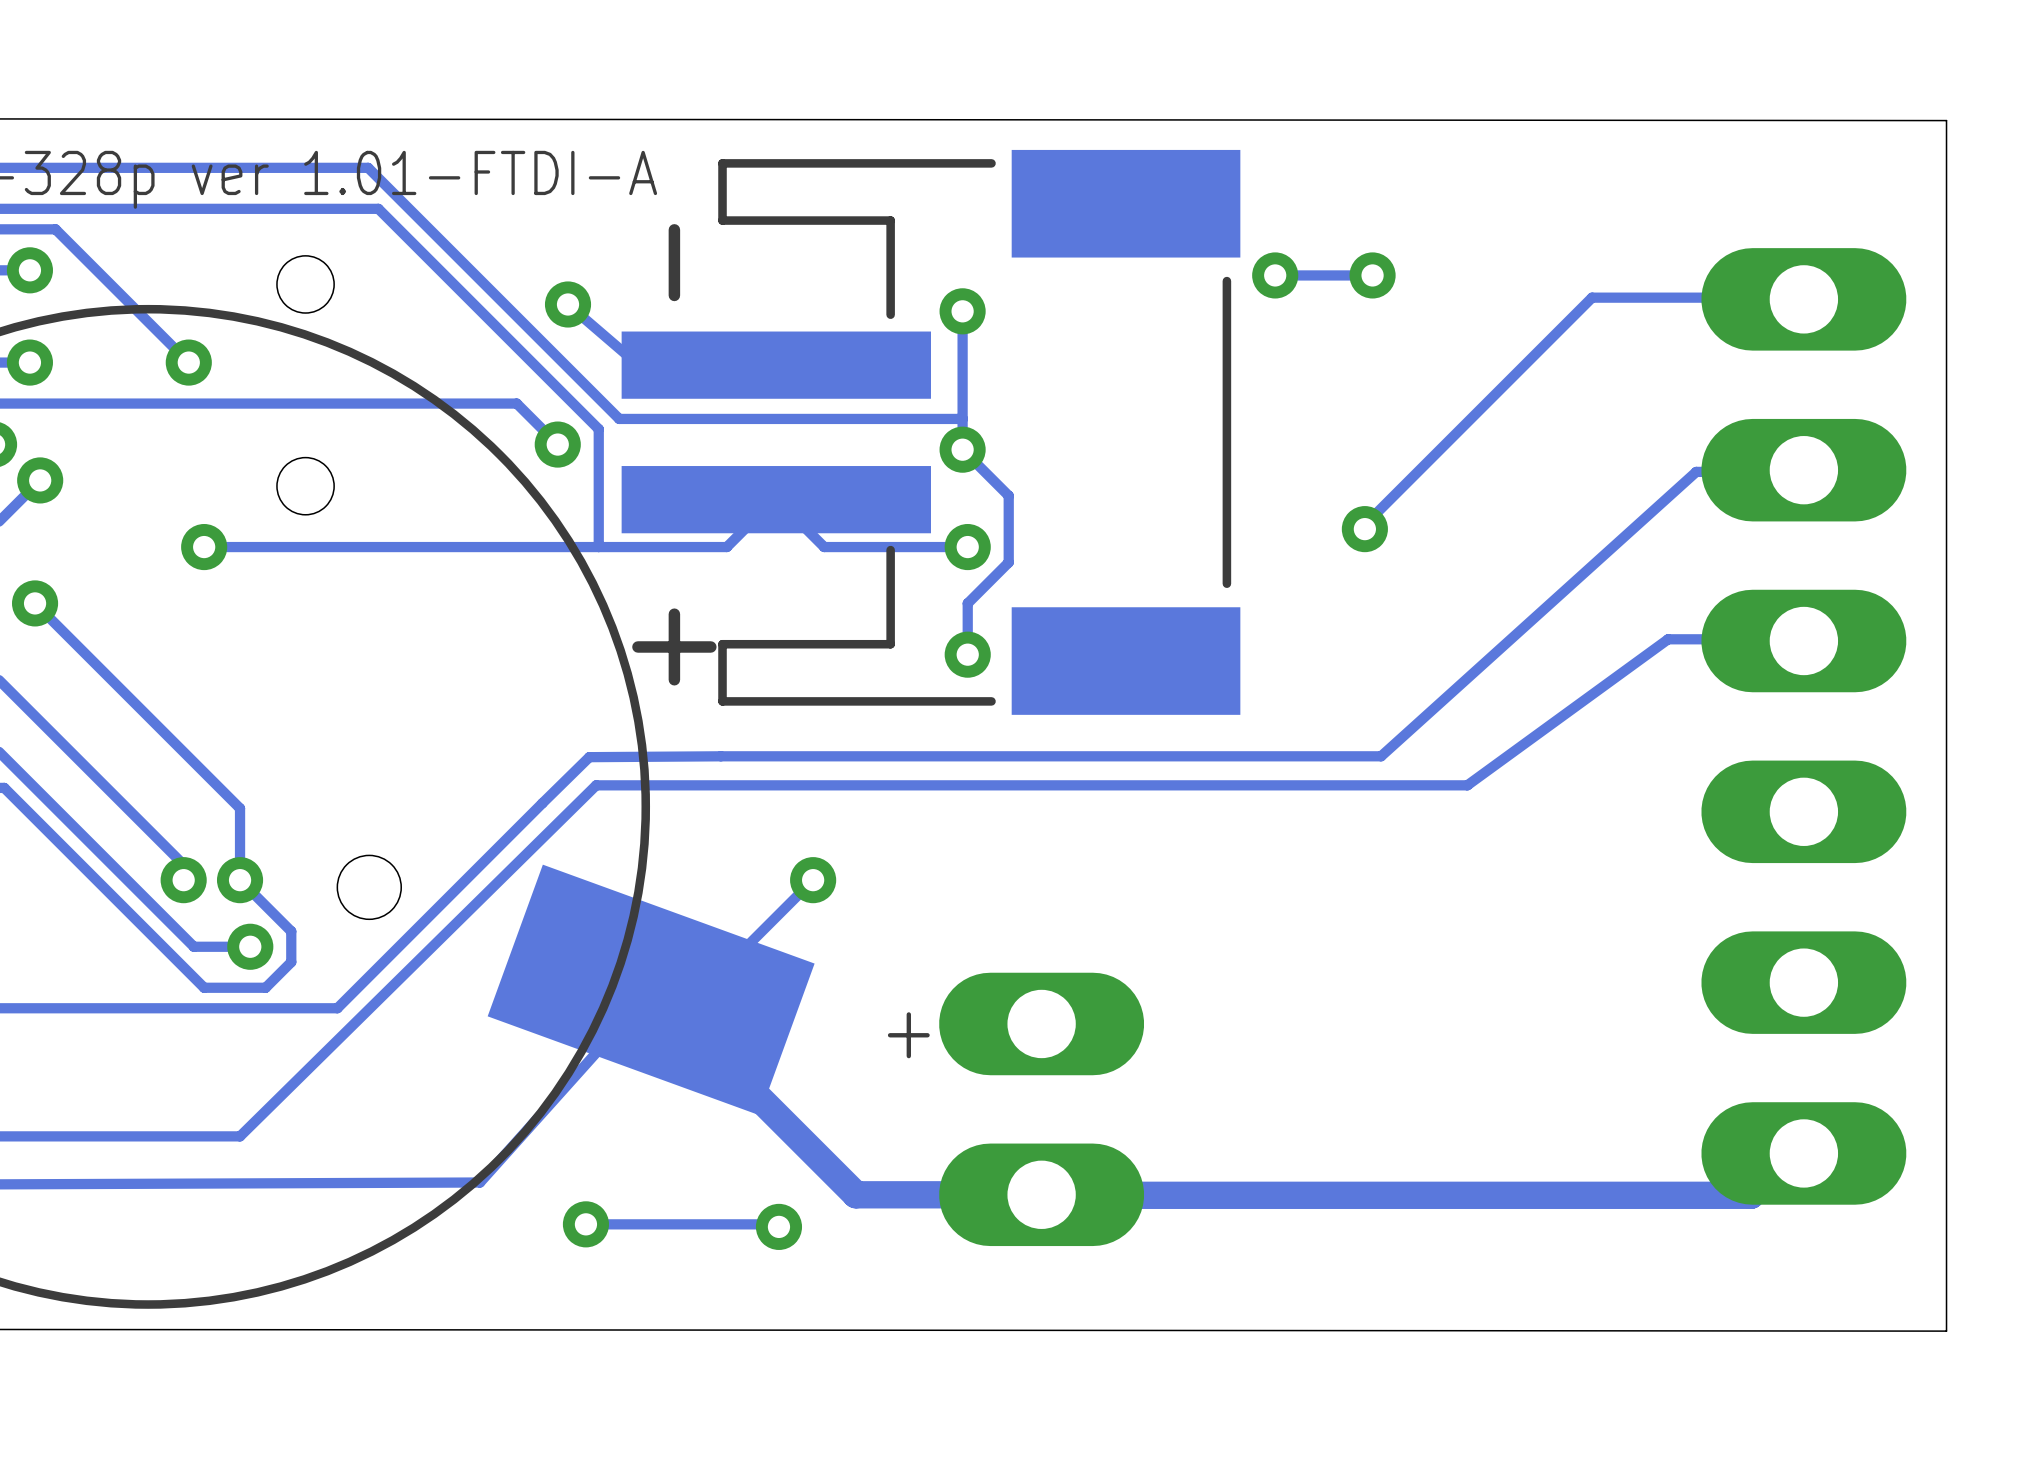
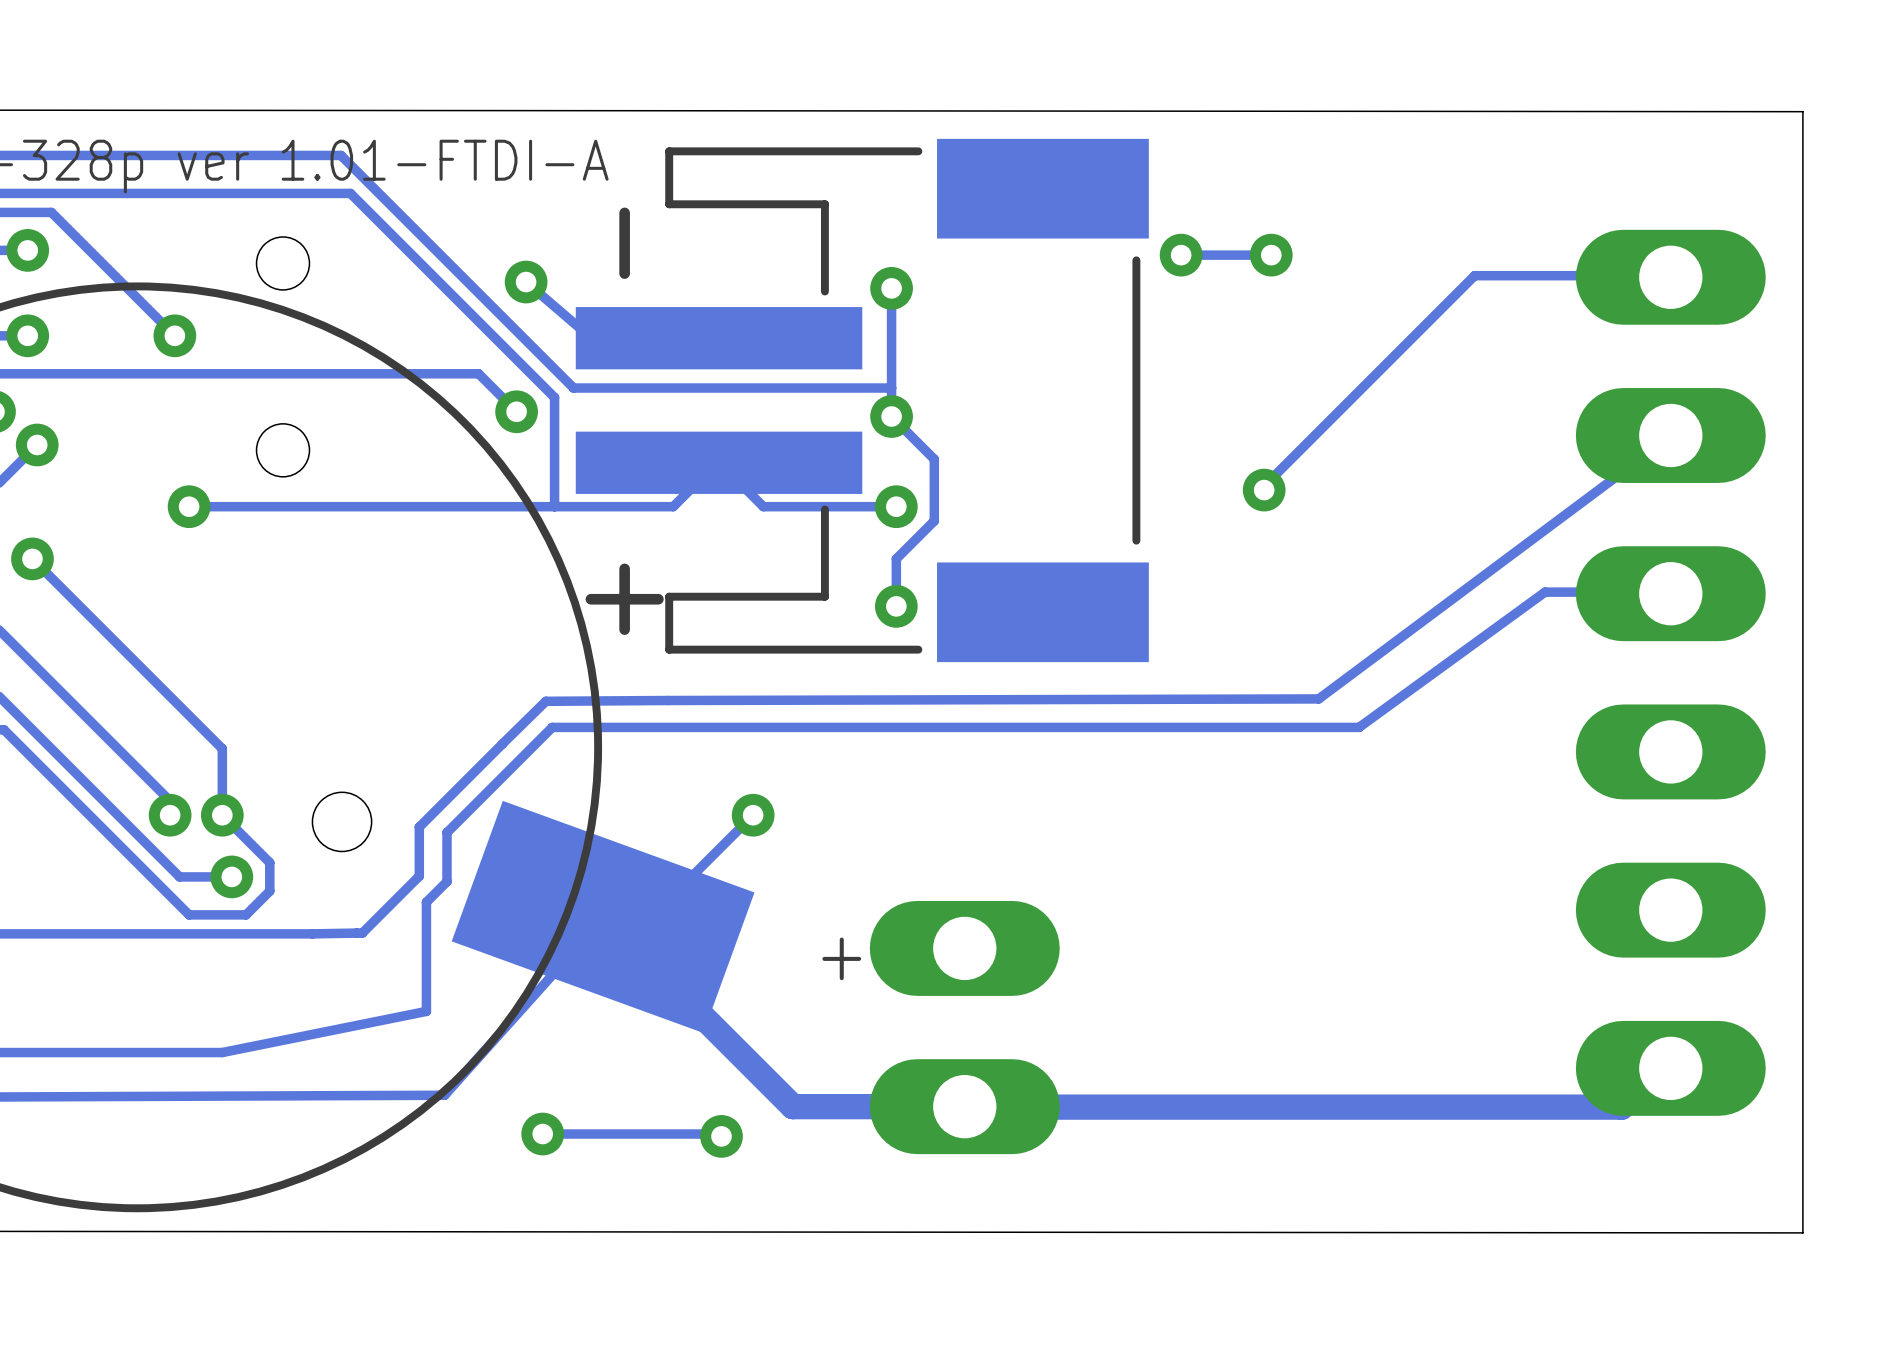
track: (1802, 471) (1696, 471) (1381, 756) (720, 756) -> (1669, 437) (1671, 435) (1318, 698) (667, 700)
track: (596, 785) (240, 1136) -> (552, 727) (446, 832) (446, 881) (426, 902) (426, 1011) (222, 1052)
track: (452, 892) (337, 1008) -> (419, 827) (419, 876) (362, 933) (312, 933)

